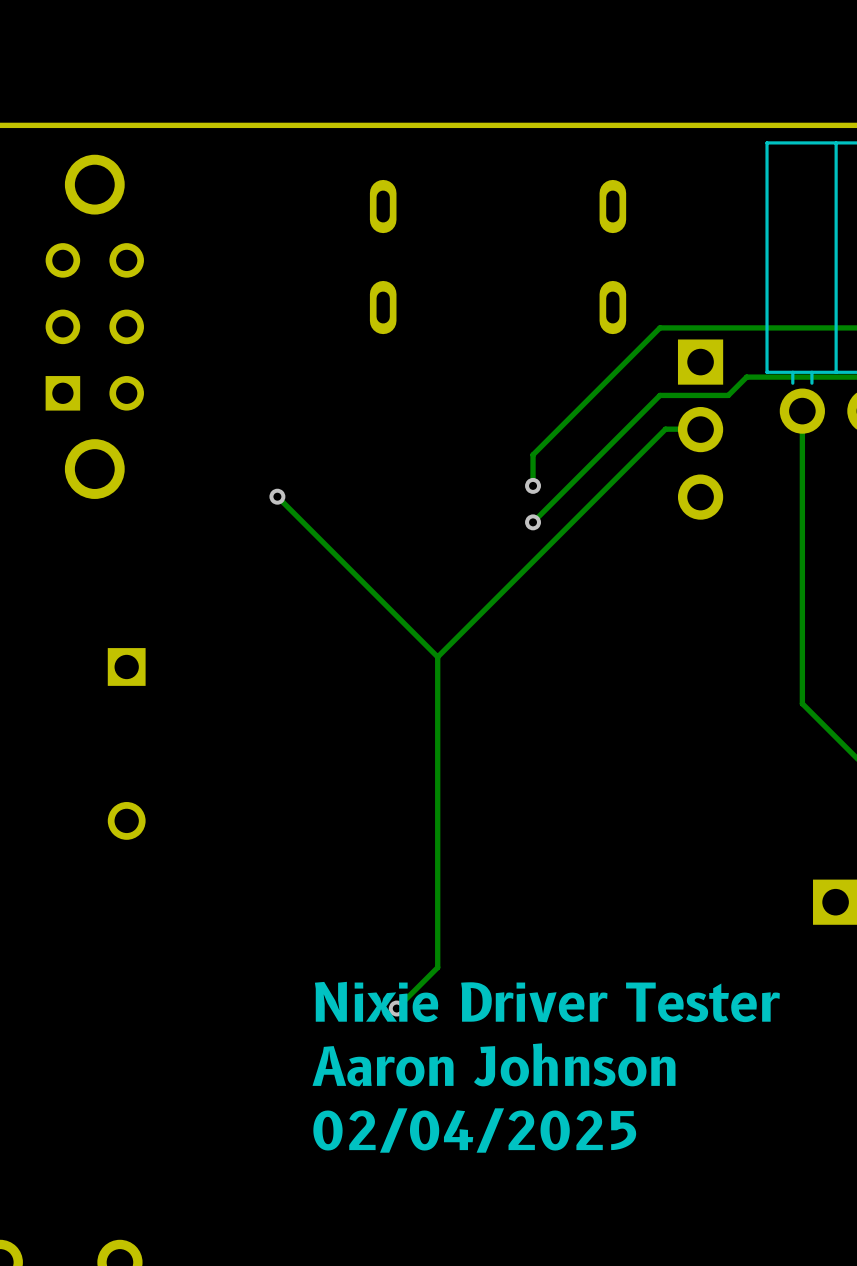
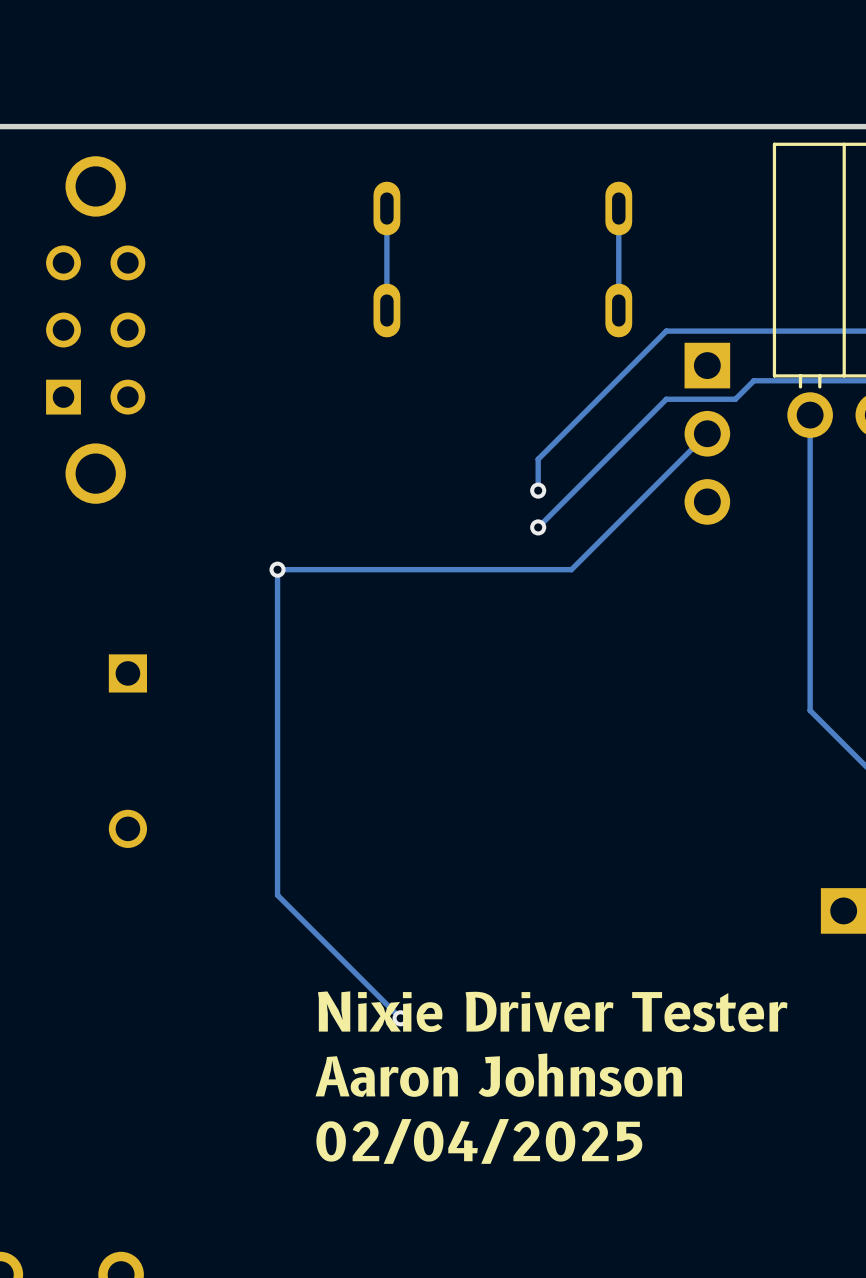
track: none -> (386, 208) (386, 310)
track: none -> (618, 208) (618, 310)
track: (700, 429) (665, 429) (437, 657) -> none
track: (277, 496) (437, 657) -> none
via position: (277, 496) -> (277, 569)
track: (437, 657) (437, 967) (396, 1008) -> (707, 433) (571, 569) (277, 569) (277, 895) (400, 1018)

